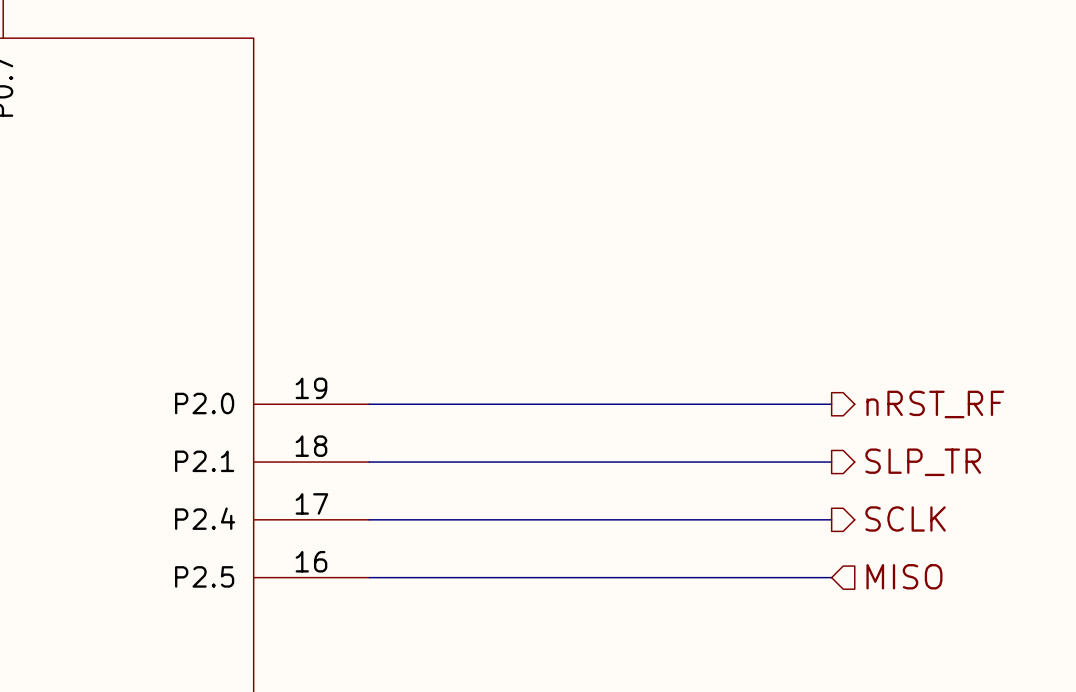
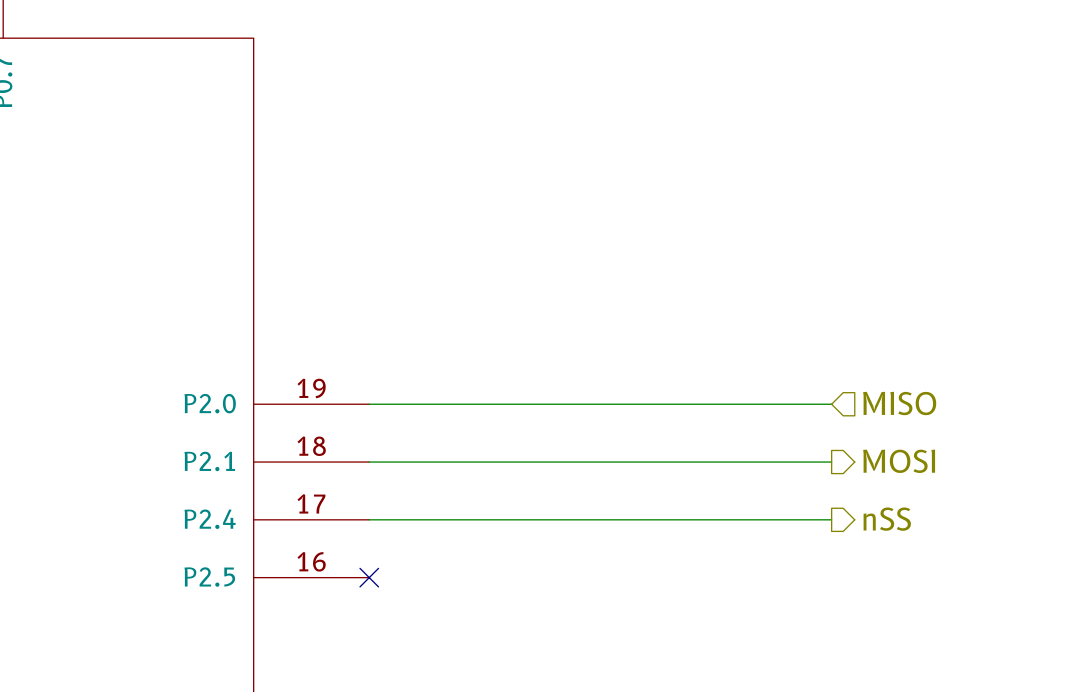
hierarchical label shape: output (935, 404) -> input (899, 403)
hierarchical label: nRST_RF (935, 404) -> MISO (899, 403)
hierarchical label: SLP_TR (923, 462) -> MOSI (899, 461)
hierarchical label: SCLK (905, 518) -> nSS (887, 519)
hierarchical label: MISO (904, 576) -> none
wire: (369, 577) (831, 577) -> none
no-connect mark: none -> (369, 577)

